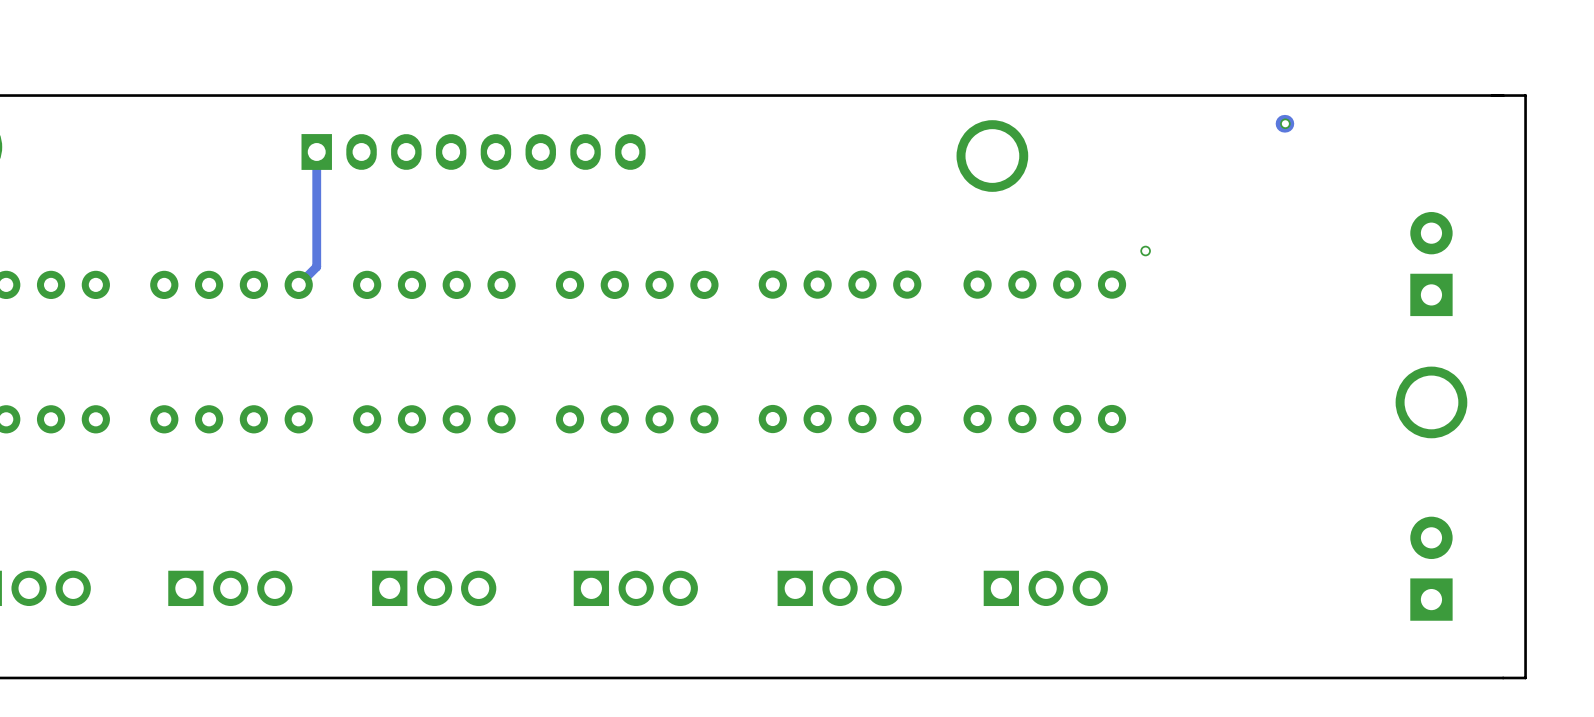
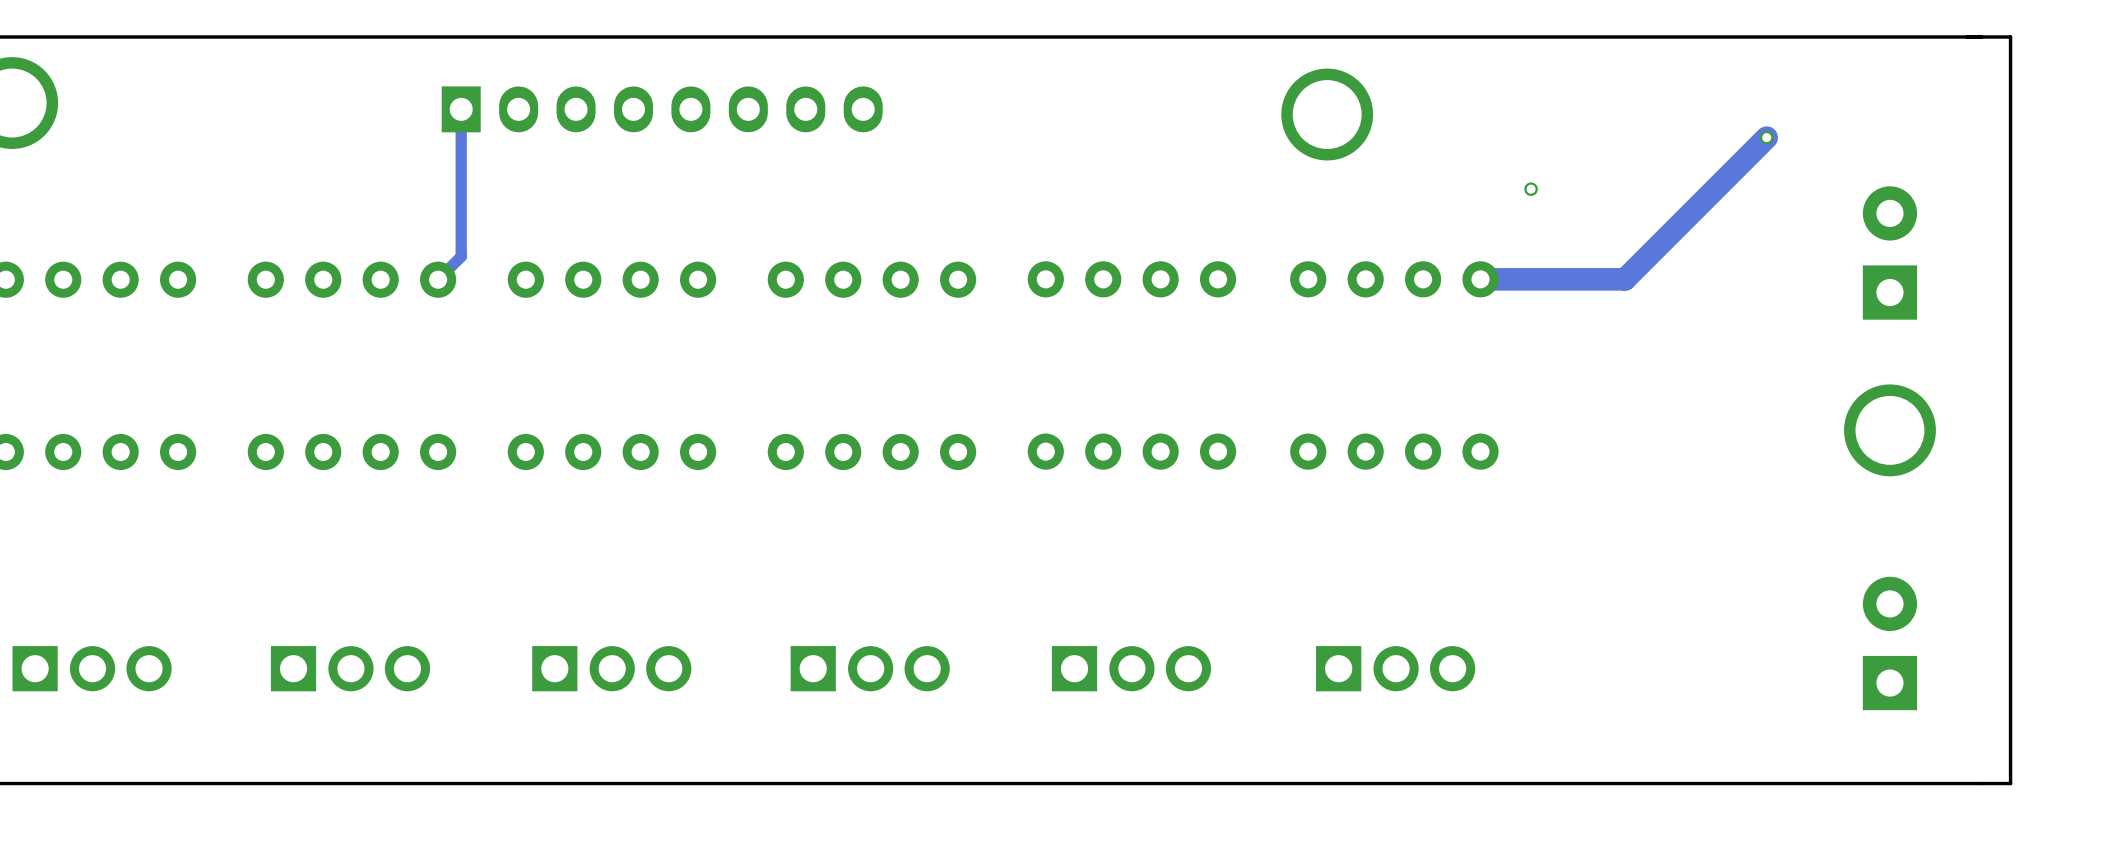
track: (1285, 123) (1284, 123) -> none
via position: (1285, 123) -> (1766, 137)
track: none -> (1766, 137) (1624, 279) (1480, 279)
via position: (1145, 251) -> (1531, 189)

